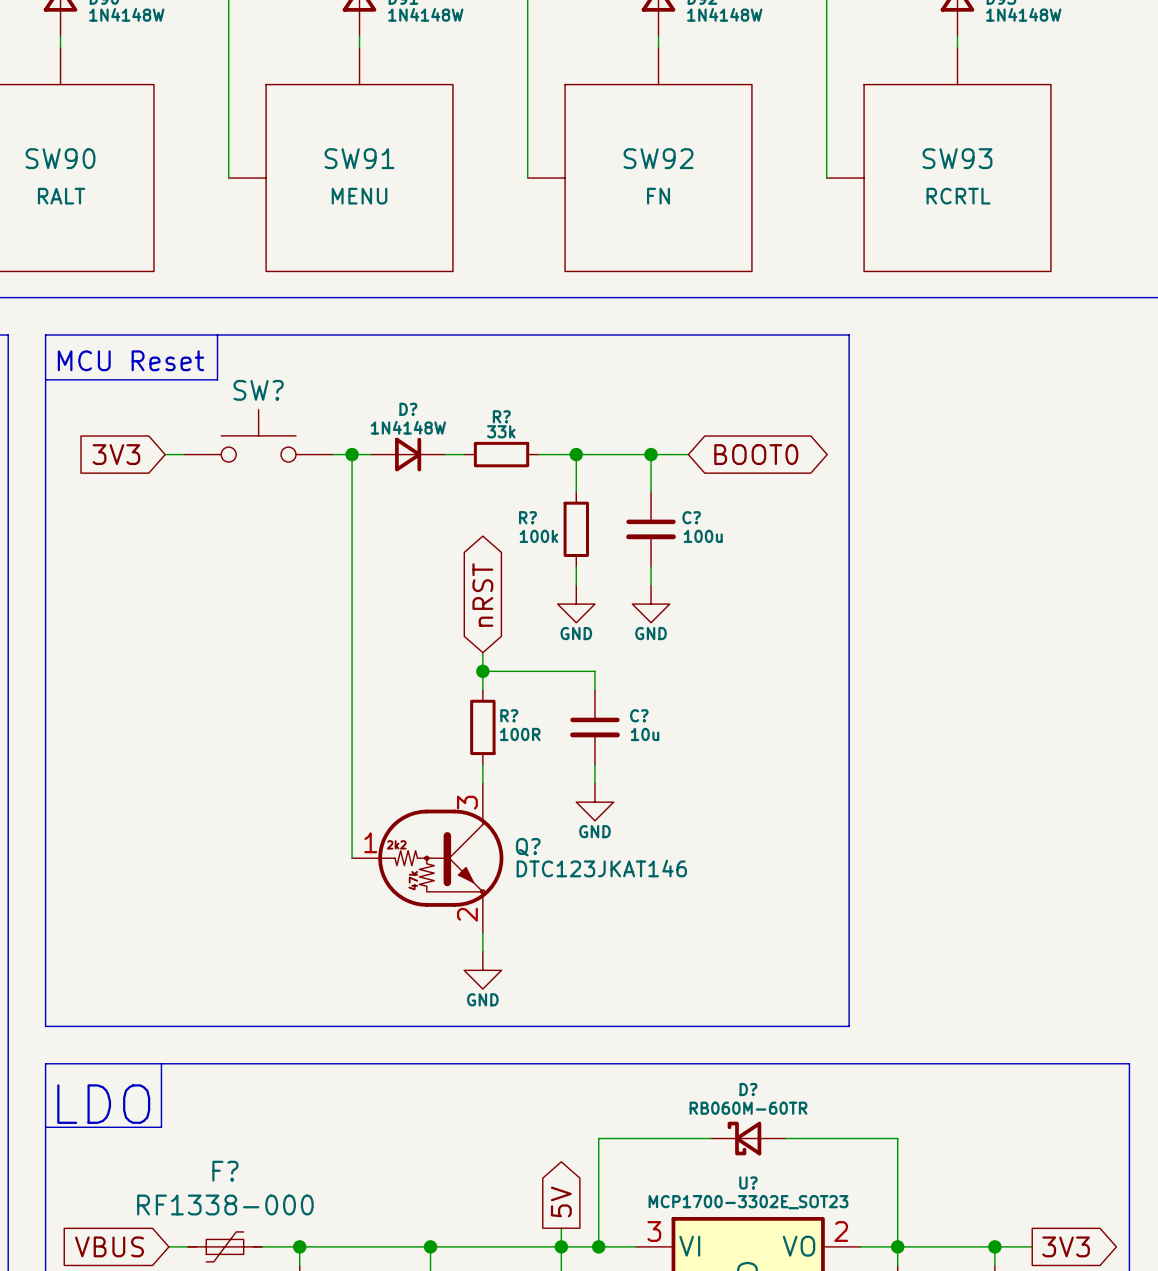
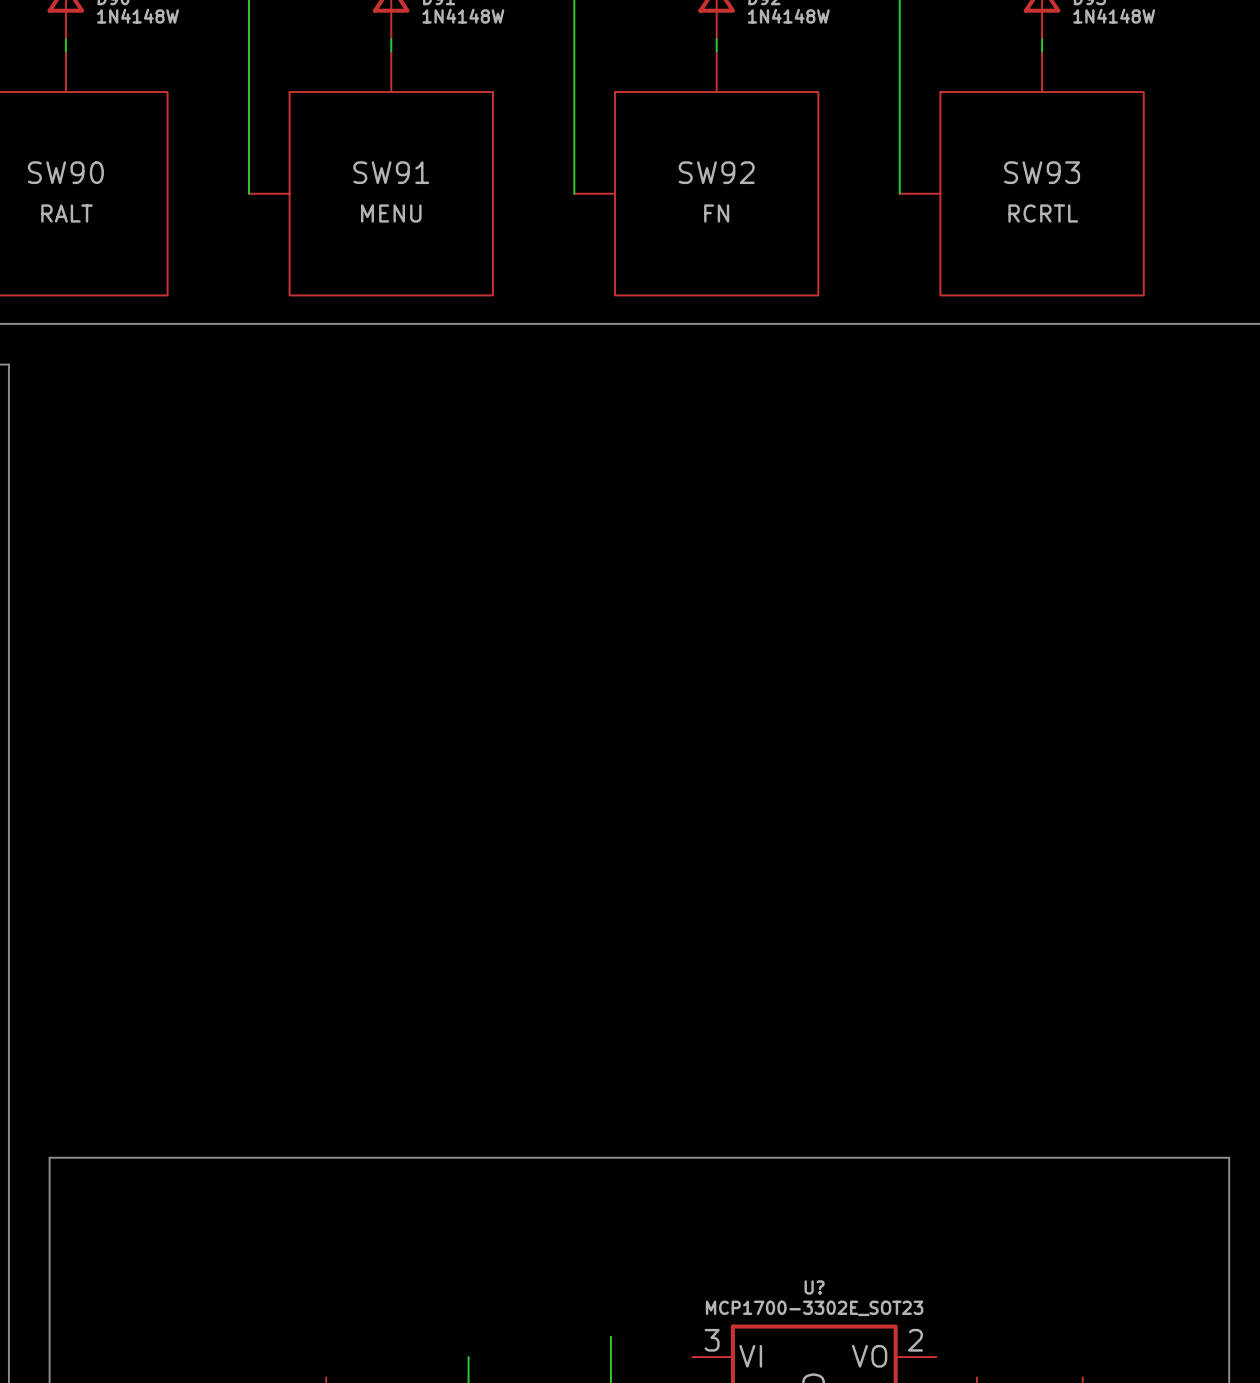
line: (45, 334) (849, 334) (849, 1026) (45, 1026) (45, 334) -> none
line: (217, 334) (217, 379) (45, 379) -> none
text: MCU Reset (130, 360) -> none
SW?: (258, 435) -> none
global label: 3V3 (116, 454) -> none
wire: (165, 454) (183, 454) -> none
wire: (333, 454) (370, 454) -> none
wire: (352, 454) (352, 858) -> none
junction: (352, 454) -> none
D?: 1N4148W (408, 454) -> none
wire: (445, 454) (464, 454) -> none
R?: 33k (501, 454) -> none
wire: (538, 454) (688, 454) -> none
wire: (576, 454) (576, 491) -> none
junction: (576, 454) -> none
wire: (651, 454) (651, 491) -> none
junction: (651, 454) -> none
global label: BOOT0 (756, 454) -> none
R?: 100k (576, 529) -> none
C?: 100u (651, 529) -> none
wire: (576, 566) (576, 585) -> none
wire: (651, 566) (651, 585) -> none
global label: nRST (482, 595) -> none
power symbol: GND (576, 604) -> none
power symbol: GND (651, 604) -> none
wire: (482, 652) (482, 690) -> none
wire: (482, 671) (594, 671) (594, 690) -> none
junction: (482, 671) -> none
R?: 100R (482, 727) -> none
C?: 10u (594, 727) -> none
wire: (482, 764) (482, 783) -> none
wire: (594, 764) (594, 783) -> none
power symbol: GND (594, 802) -> none
Q?: DTC123JKAT146 (427, 858) -> none
wire: (482, 932) (482, 951) -> none
power symbol: GND (482, 970) -> none
line: (161, 1063) (161, 1127) (45, 1127) -> none
text: LDO (103, 1104) -> none
wire: (710, 1138) (598, 1138) (598, 1246) -> none
D?: RB060M-60TR (748, 1138) -> none
wire: (785, 1138) (897, 1138) (897, 1265) -> none
global label: 5V (561, 1201) -> none
global label: VBUS (109, 1246) -> none
wire: (168, 1246) (187, 1246) -> none
F?: RF1338-000 (224, 1246) -> none
wire: (262, 1246) (636, 1246) -> none
wire: (299, 1246) (299, 1265) -> none
junction: (299, 1246) -> none
junction: (430, 1246) -> none
junction: (561, 1246) -> none
junction: (598, 1246) -> none
wire: (860, 1246) (1032, 1246) -> none
junction: (897, 1246) -> none
wire: (994, 1246) (994, 1265) -> none
junction: (994, 1246) -> none
global label: 3V3 (1066, 1246) -> none

